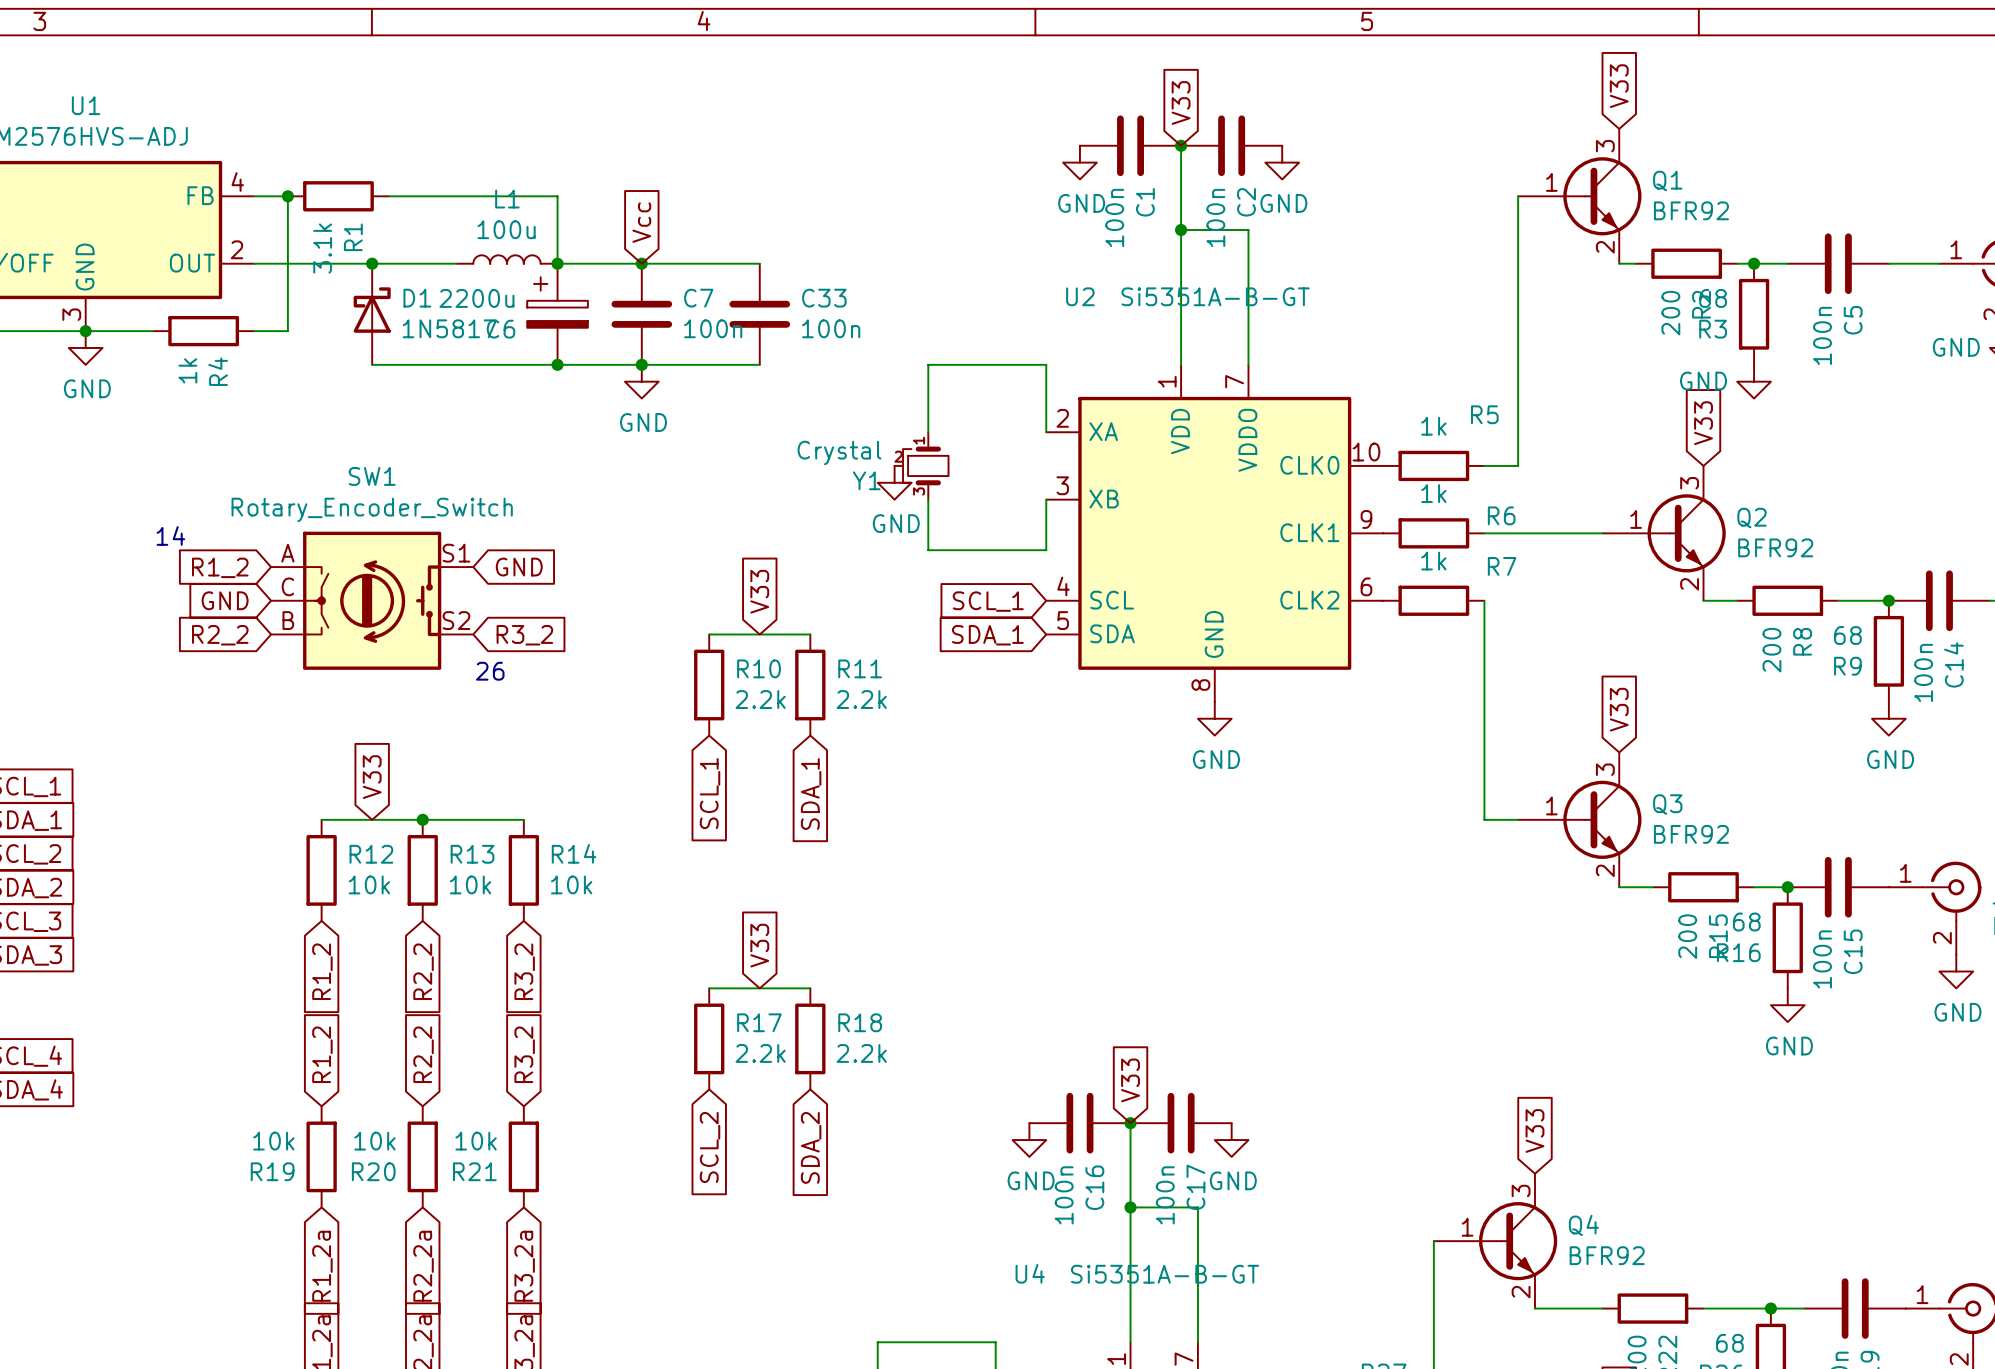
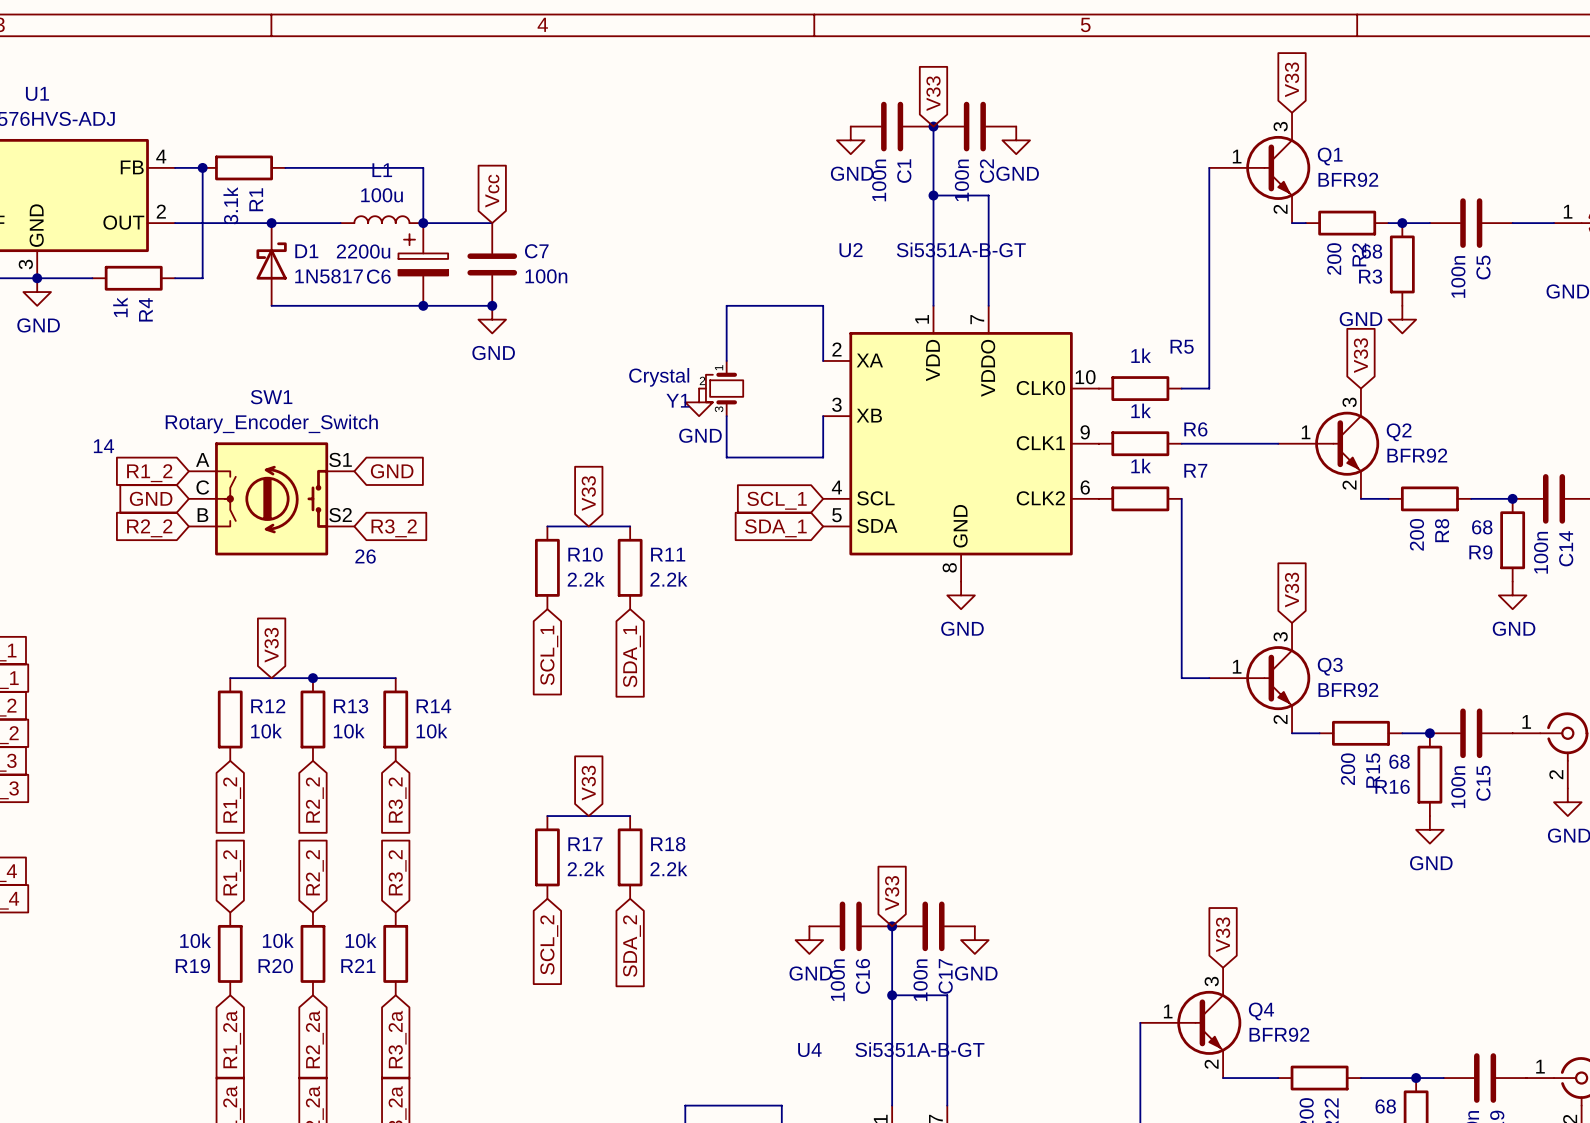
wire: (641, 263) (759, 263) -> none
junction: (641, 263) -> none
C33: 100n (759, 314) -> none
wire: (641, 364) (759, 364) -> none

